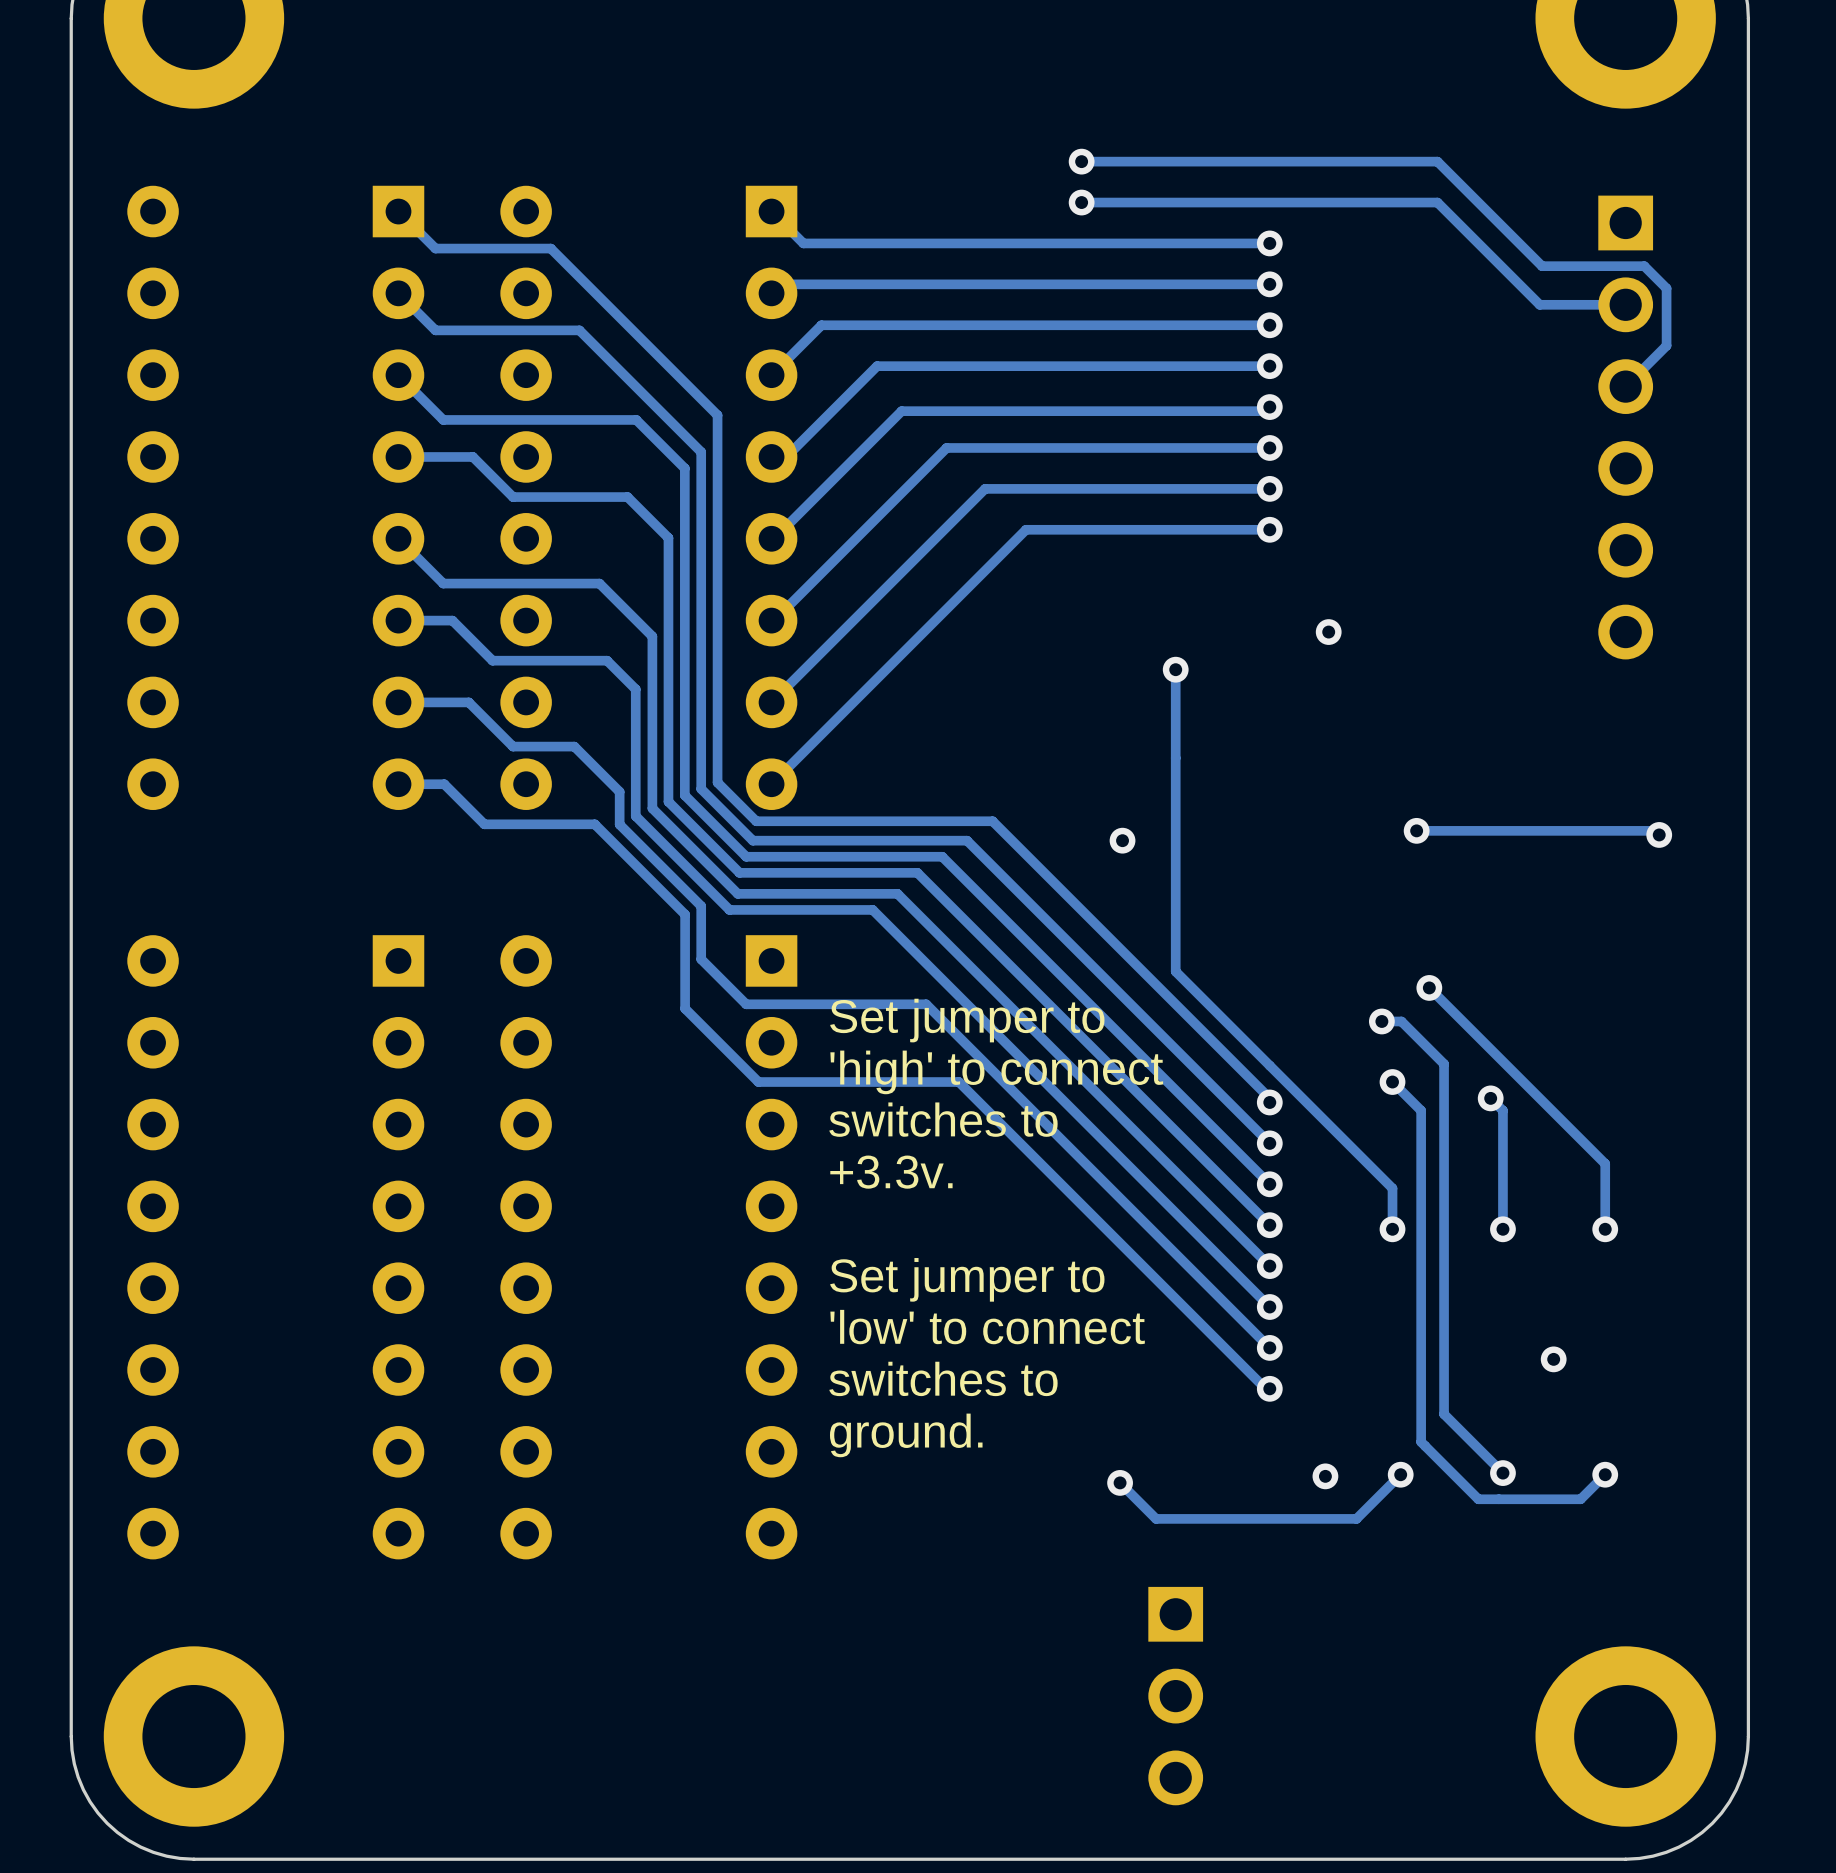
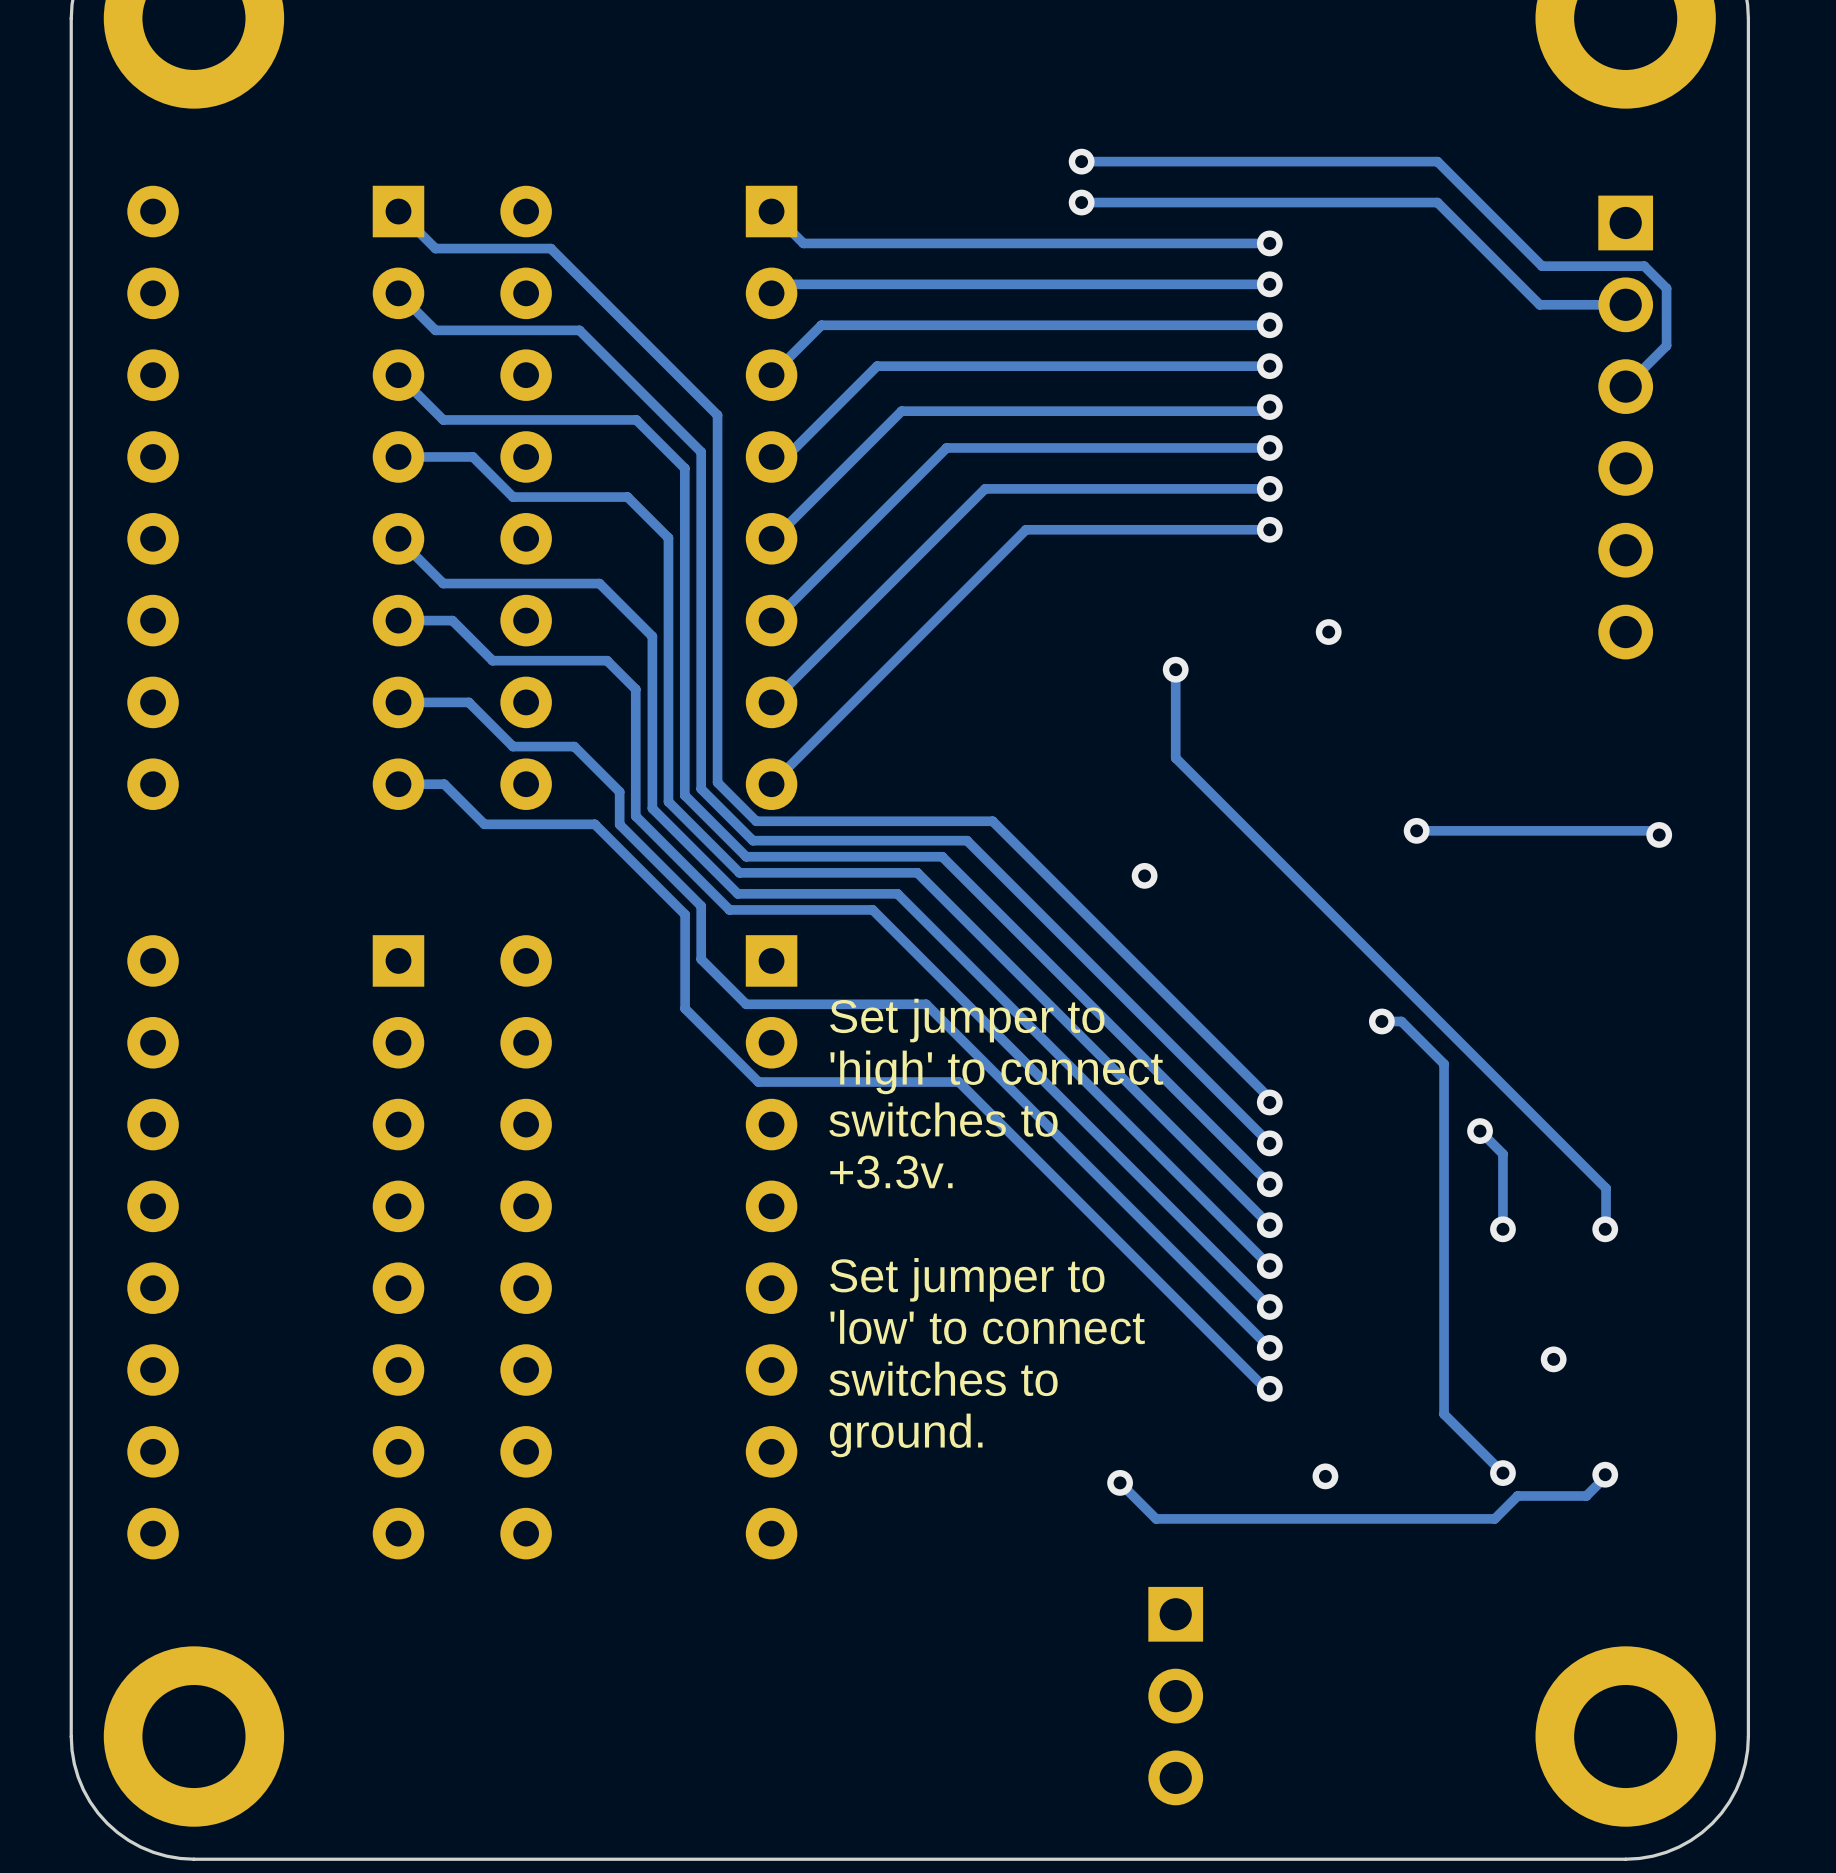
track: (1175, 758) (1175, 971) (1392, 1188) (1392, 1229) -> (1175, 758) (1606, 1188) (1606, 1229)
via position: (1122, 840) -> (1144, 875)
track: (1429, 987) (1605, 1163) (1605, 1229) -> none
via: (1429, 987) -> none
track: (1392, 1082) (1421, 1110) (1421, 1441) (1478, 1499) (1580, 1499) (1605, 1474) -> none
via: (1392, 1082) -> none
track: (1490, 1098) (1502, 1110) (1502, 1154) -> (1480, 1131) (1502, 1154)
via position: (1490, 1098) -> (1480, 1131)
via: (1392, 1229) -> none
track: (1400, 1474) (1356, 1518) -> (1607, 1474) (1586, 1495) (1517, 1495) (1494, 1518) (1356, 1518)
via: (1400, 1474) -> none

